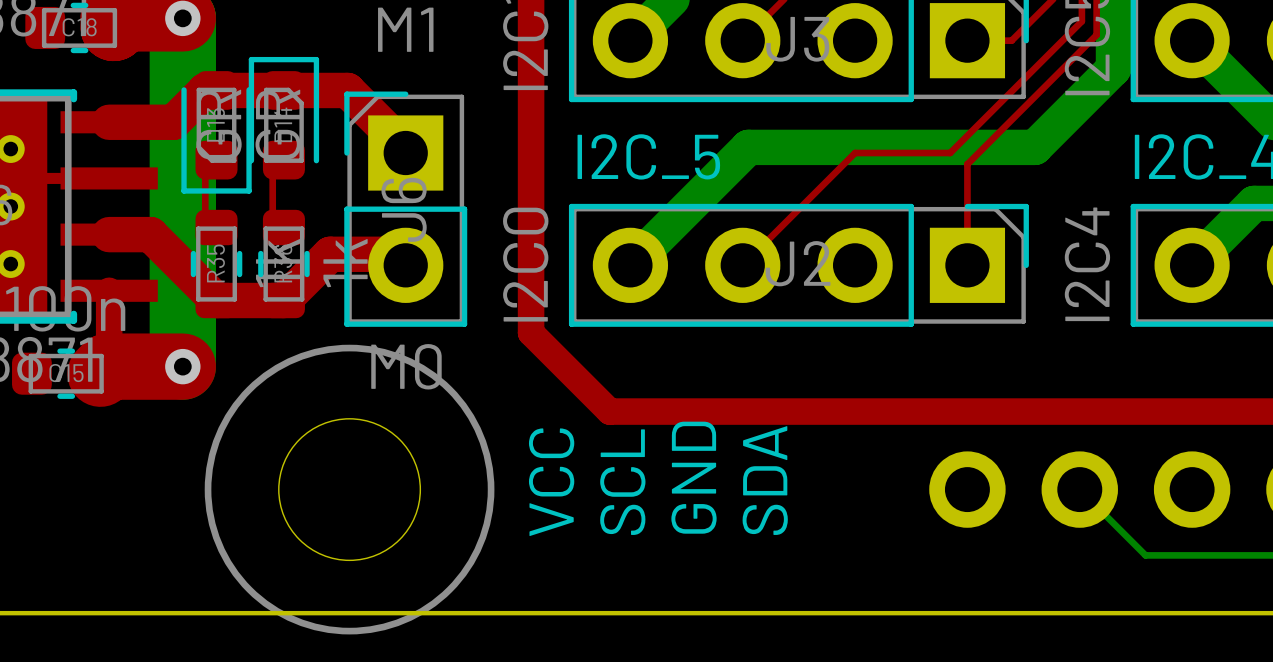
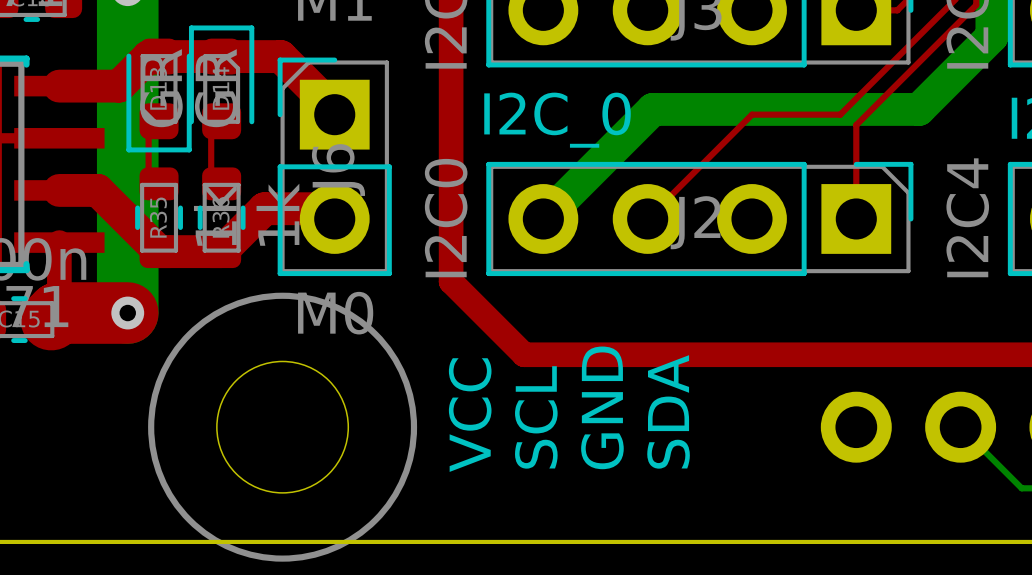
text: I2C_5 (648, 156) -> I2C_0 (557, 120)

